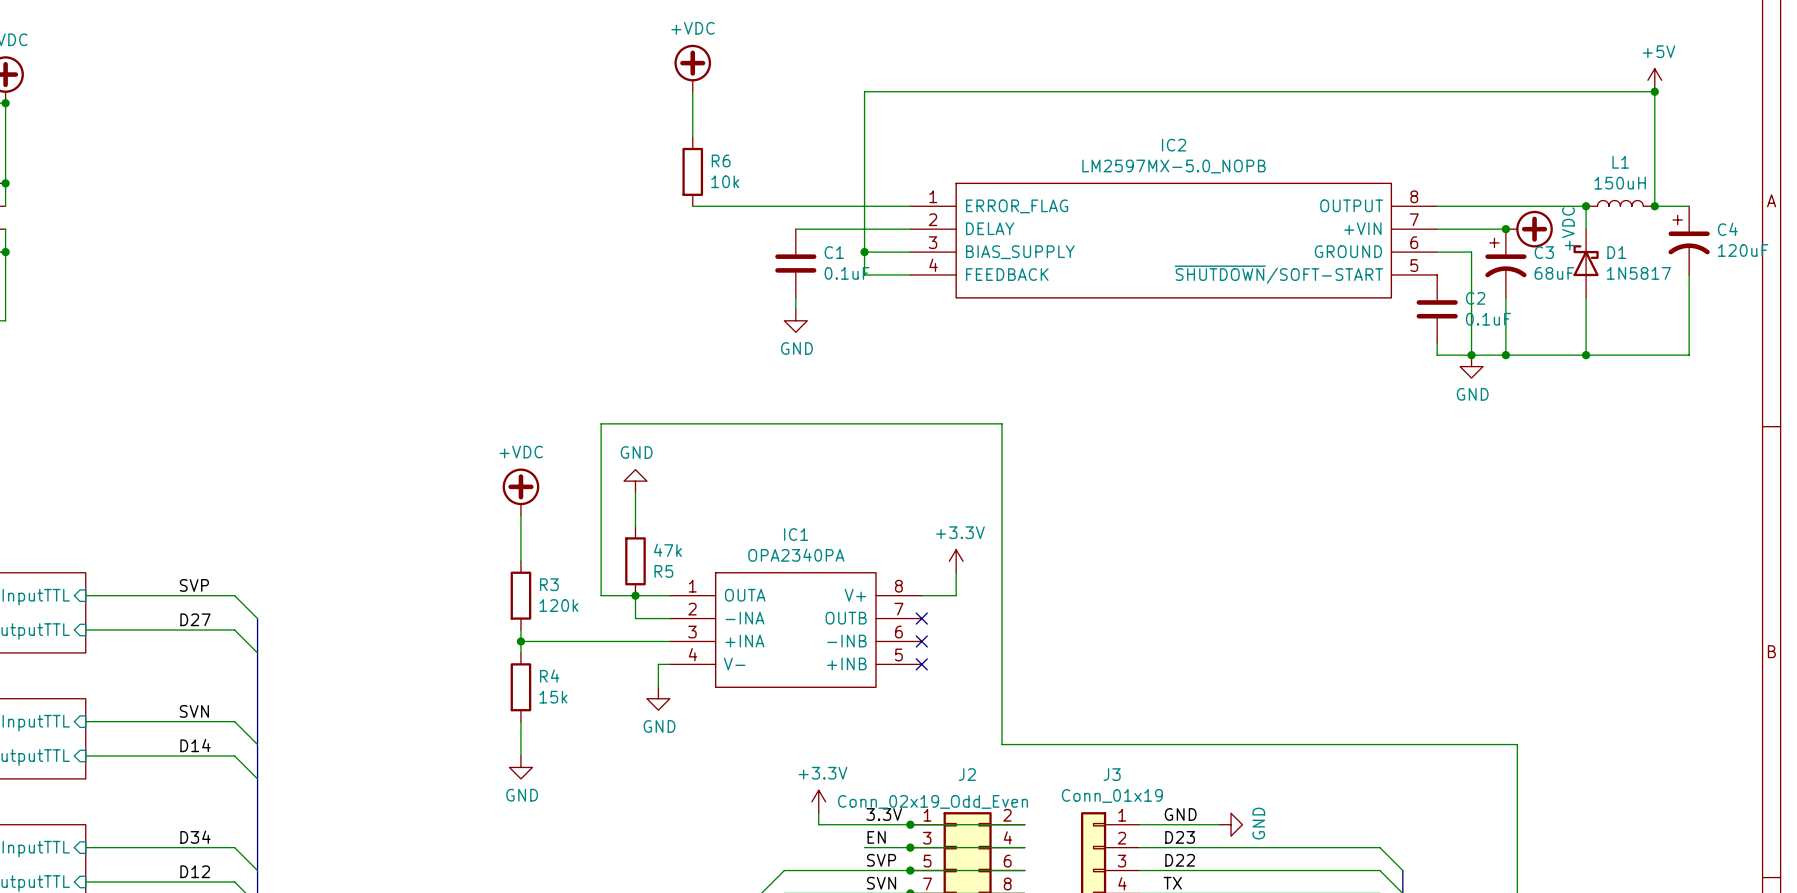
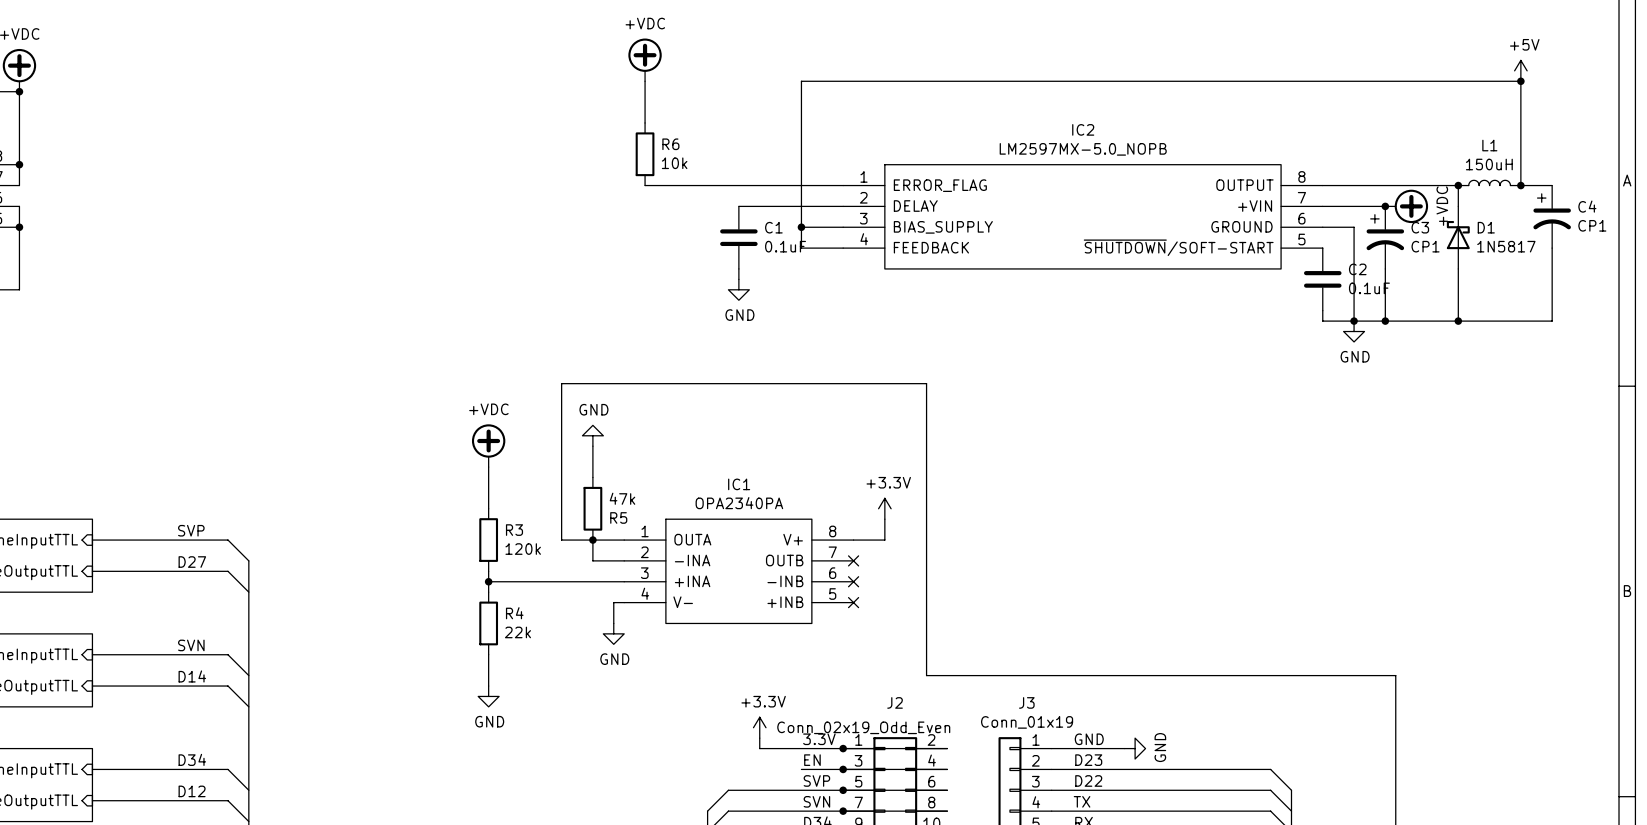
C4 value: 120uF (1743, 250) -> CP1 (1592, 225)
C3 value: 68uF (1554, 273) -> CP1 (1425, 246)
R4 value: 15k (553, 697) -> 22k (517, 632)

